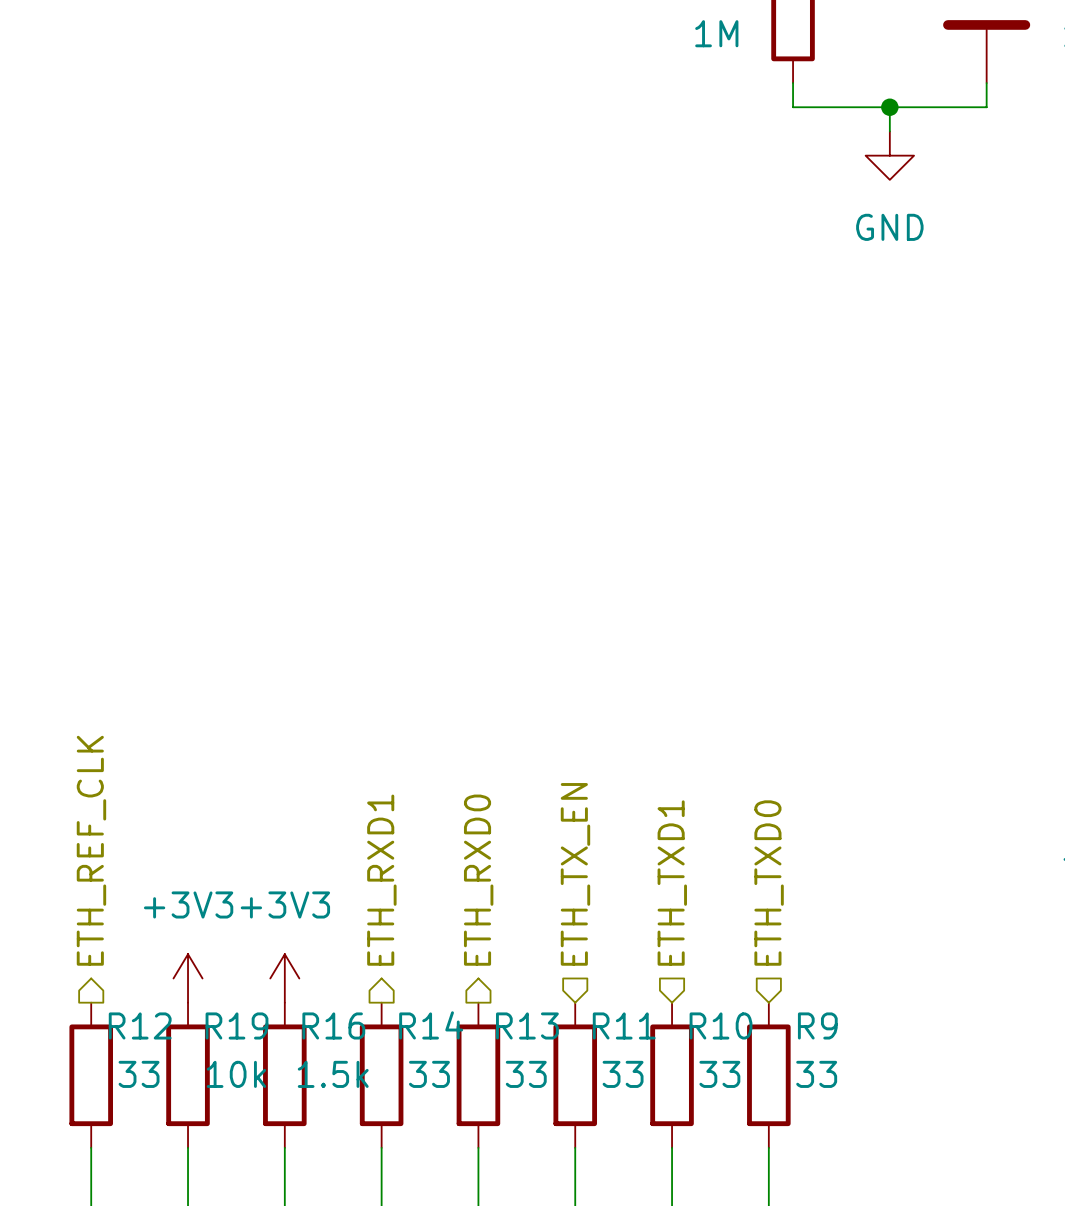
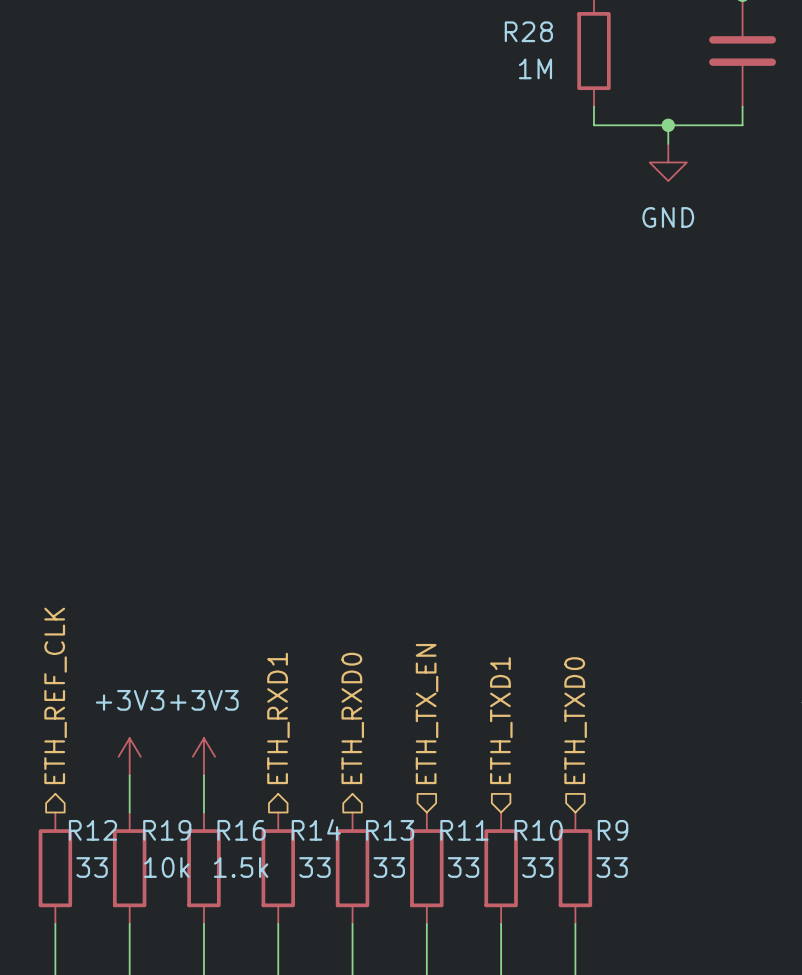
power symbol position: +3V3 (188, 978) -> +3V3 (129, 756)
power symbol position: +3V3 (284, 978) -> +3V3 (203, 756)

